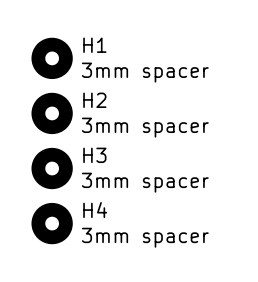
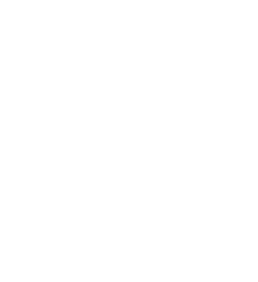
H1: 3mm spacer (52, 58) -> none
H2: 3mm spacer (52, 113) -> none
H3: 3mm spacer (52, 168) -> none
H4: 3mm spacer (52, 223) -> none

